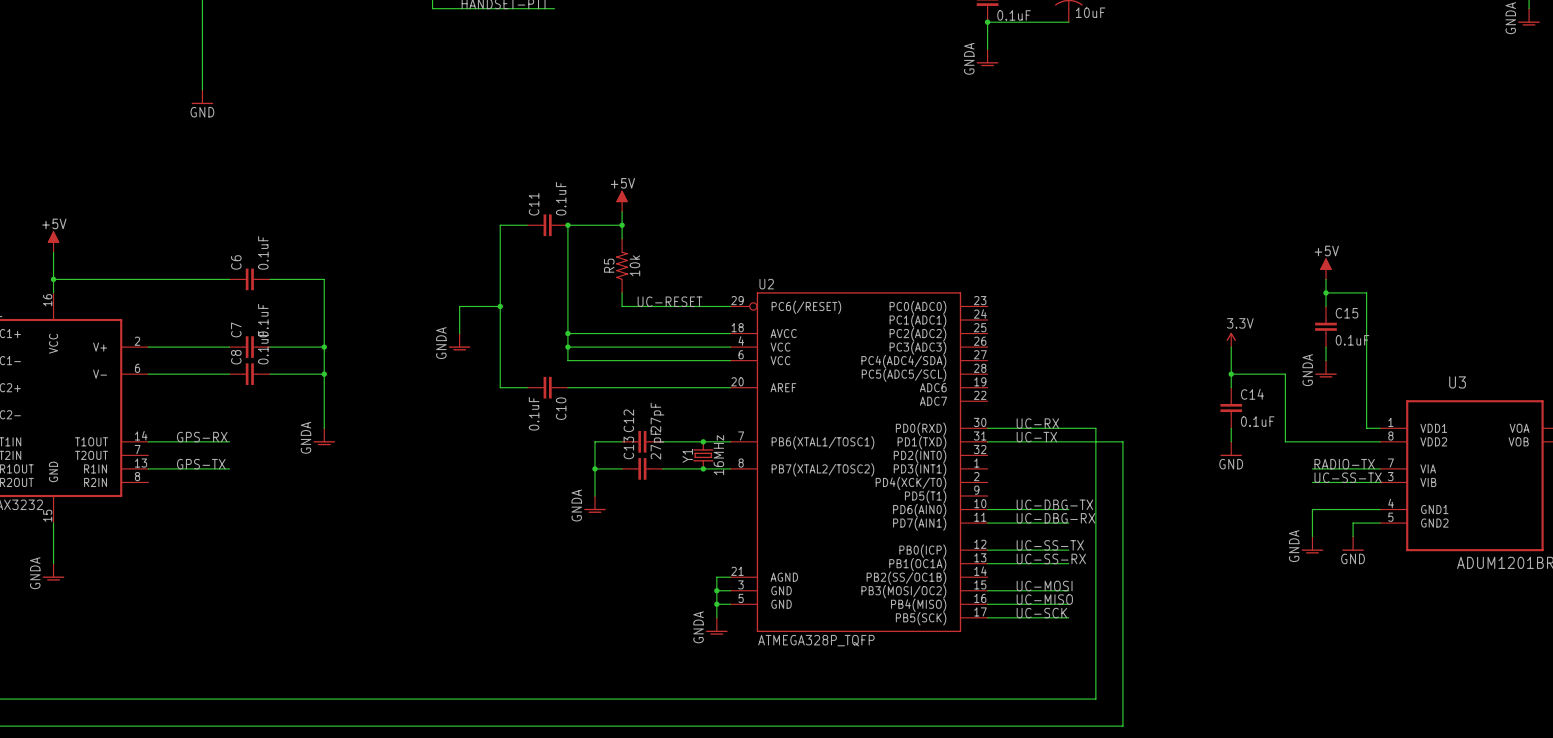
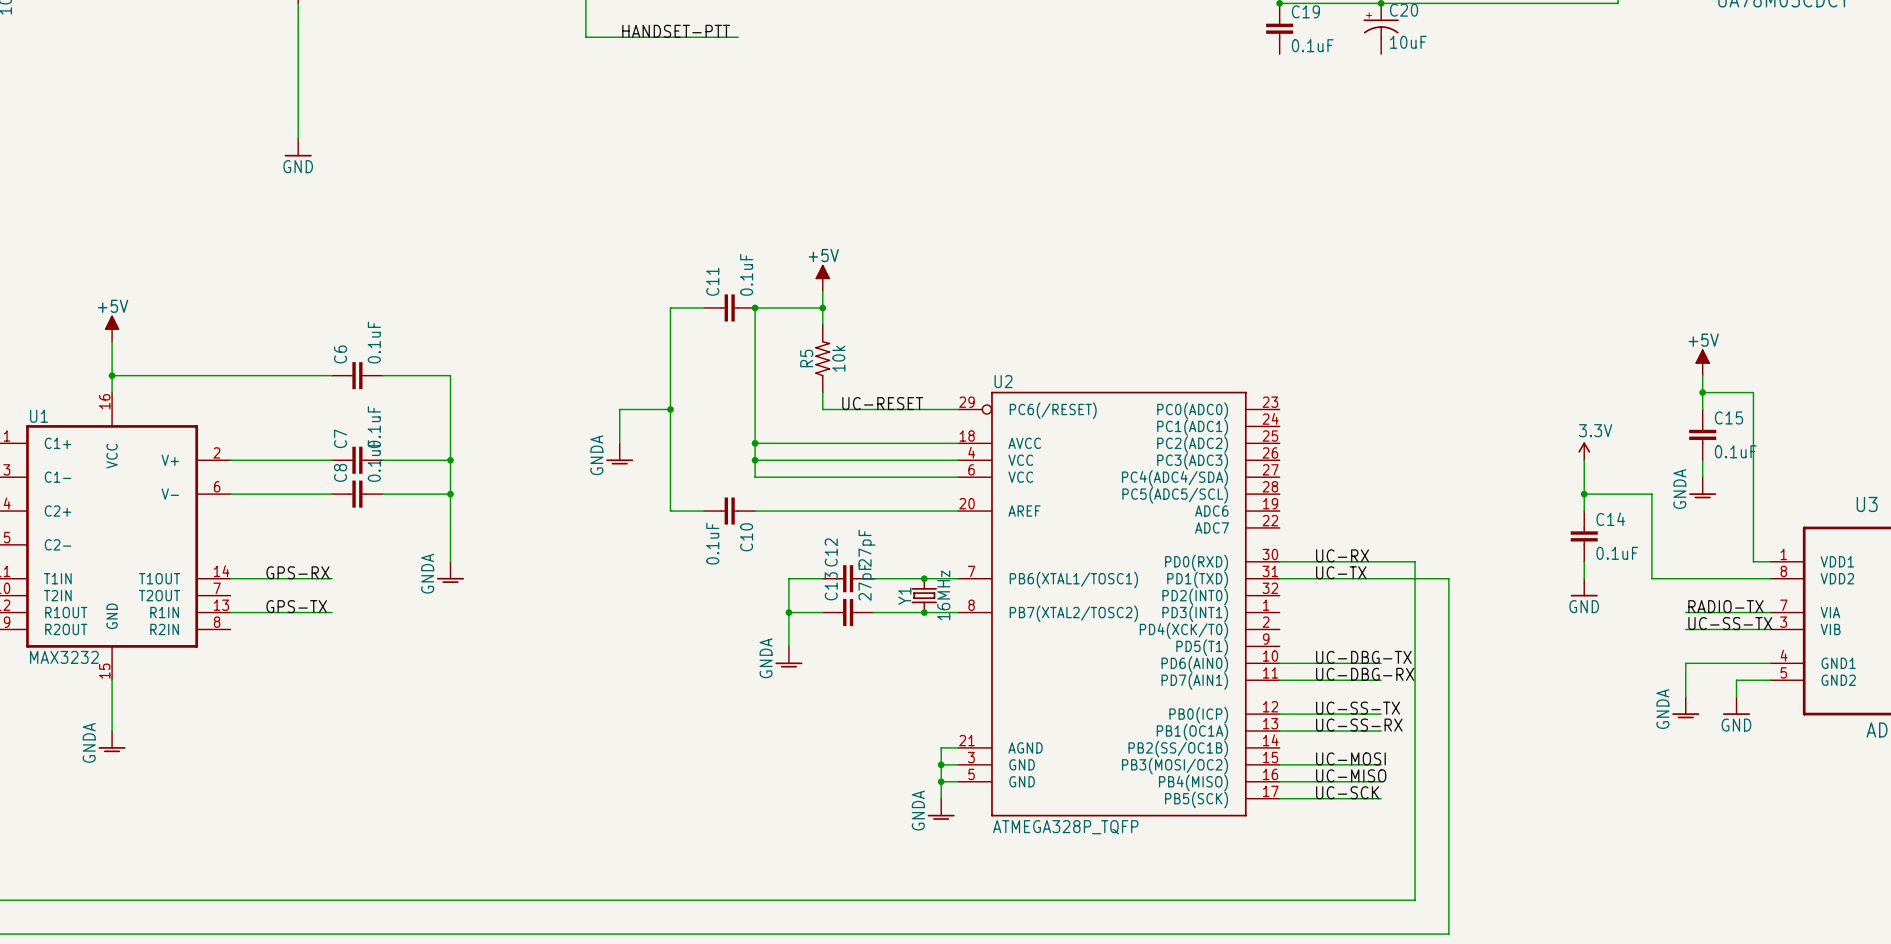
junction: (987, 22) -> none
wire: (1068, 22) (987, 22) (987, 49) -> none
power symbol: GNDA (987, 57) -> none

